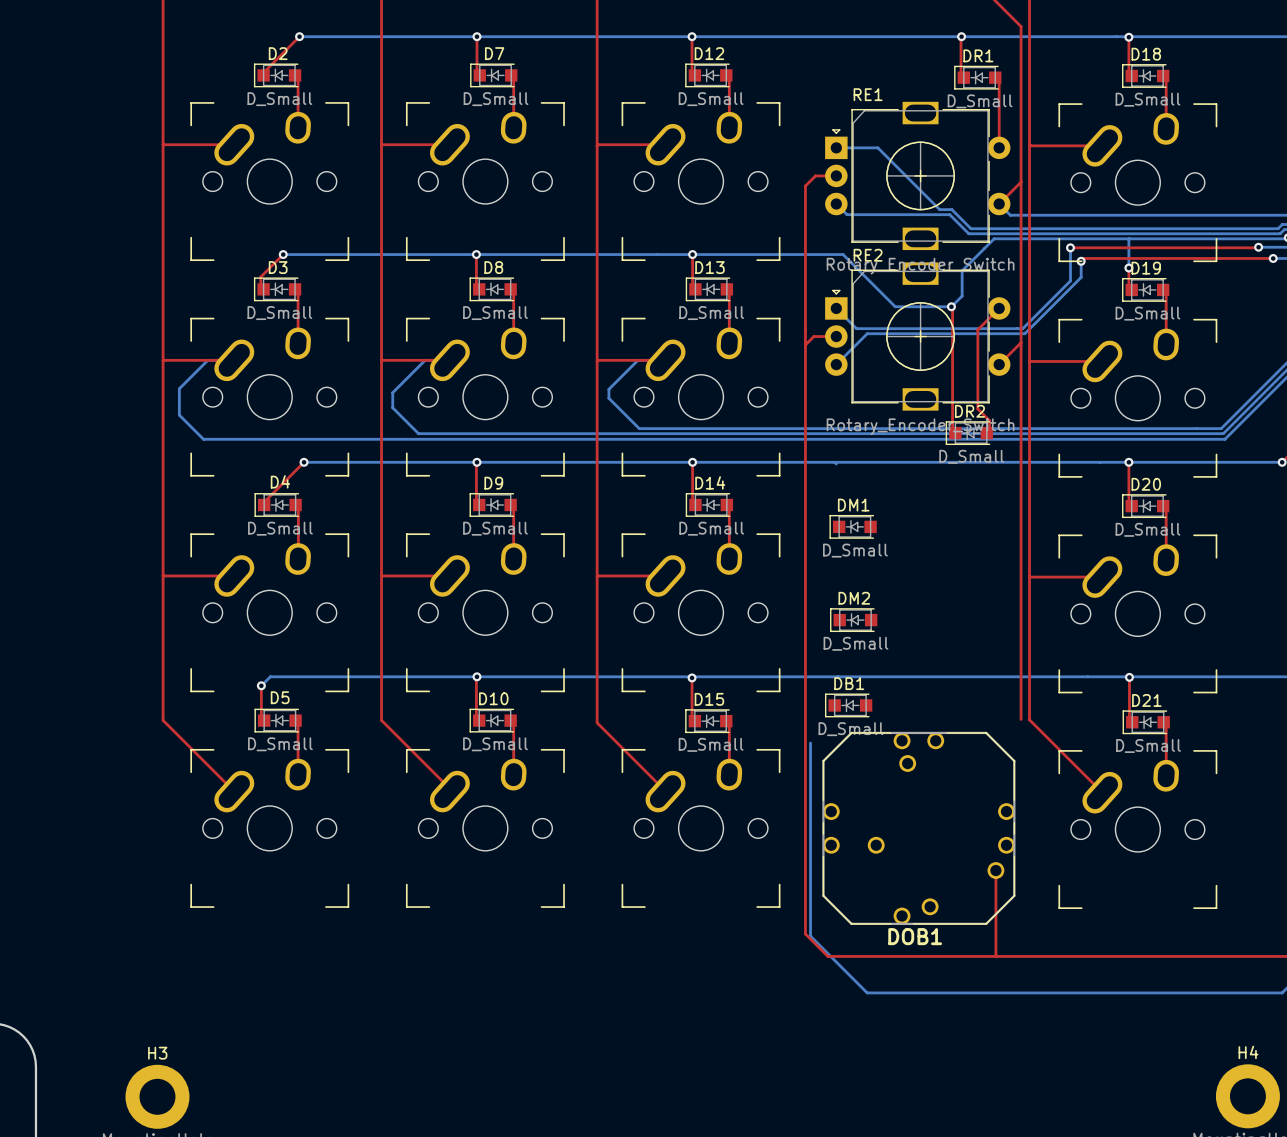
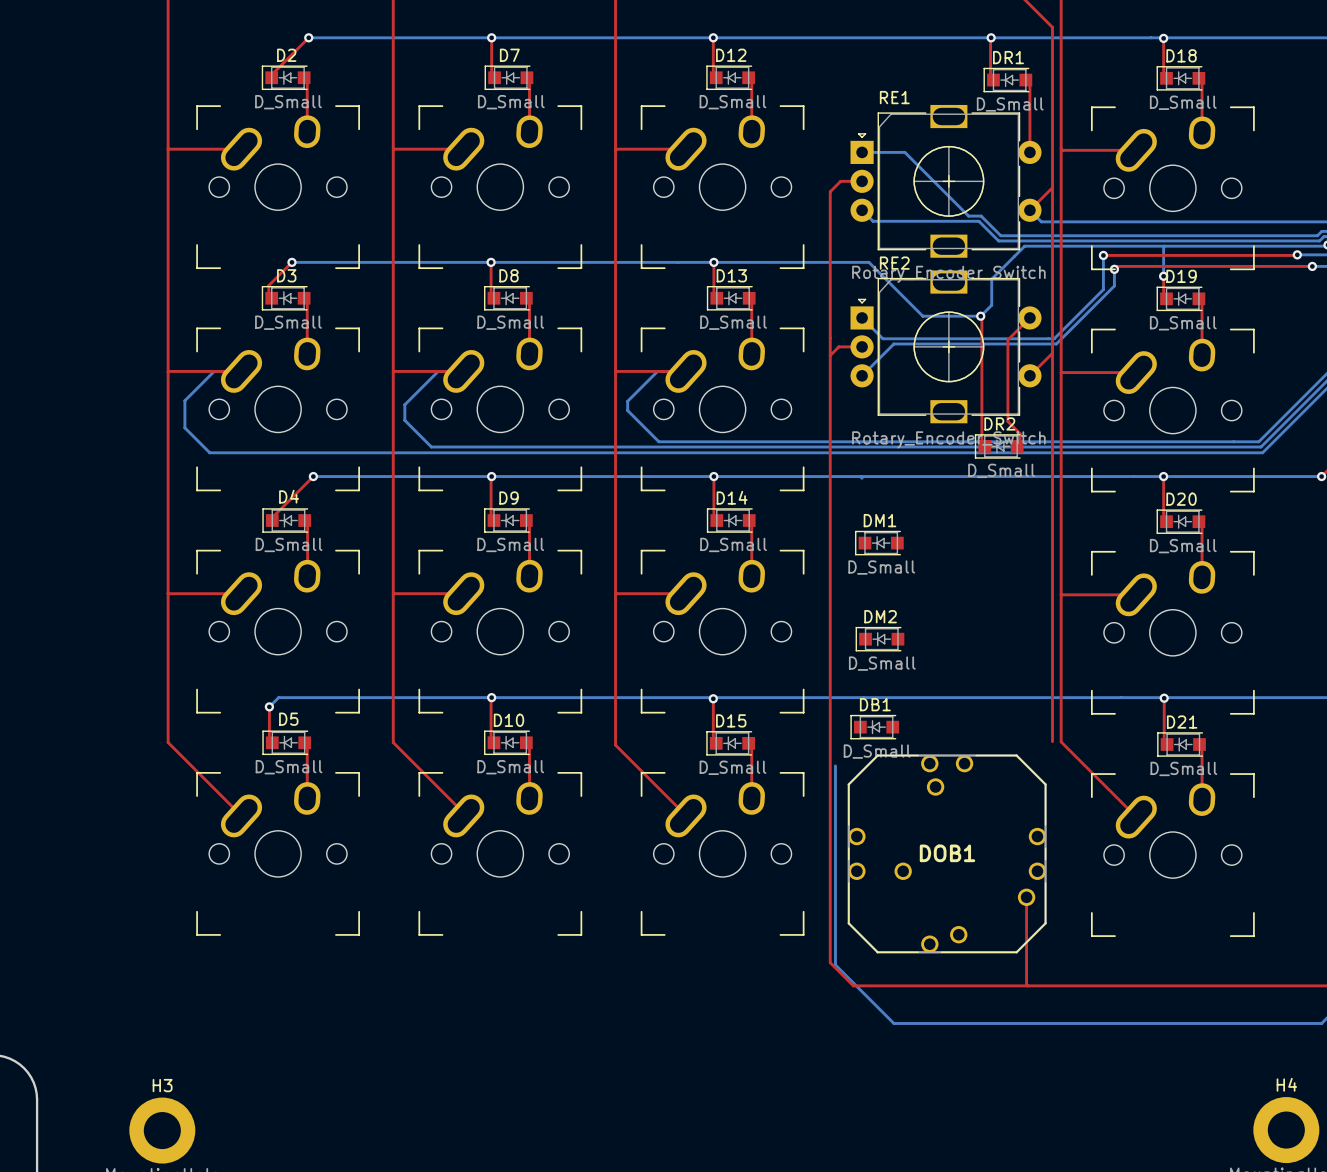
DOB1 name position: DOB1 (915, 936) -> DOB1 (947, 853)

